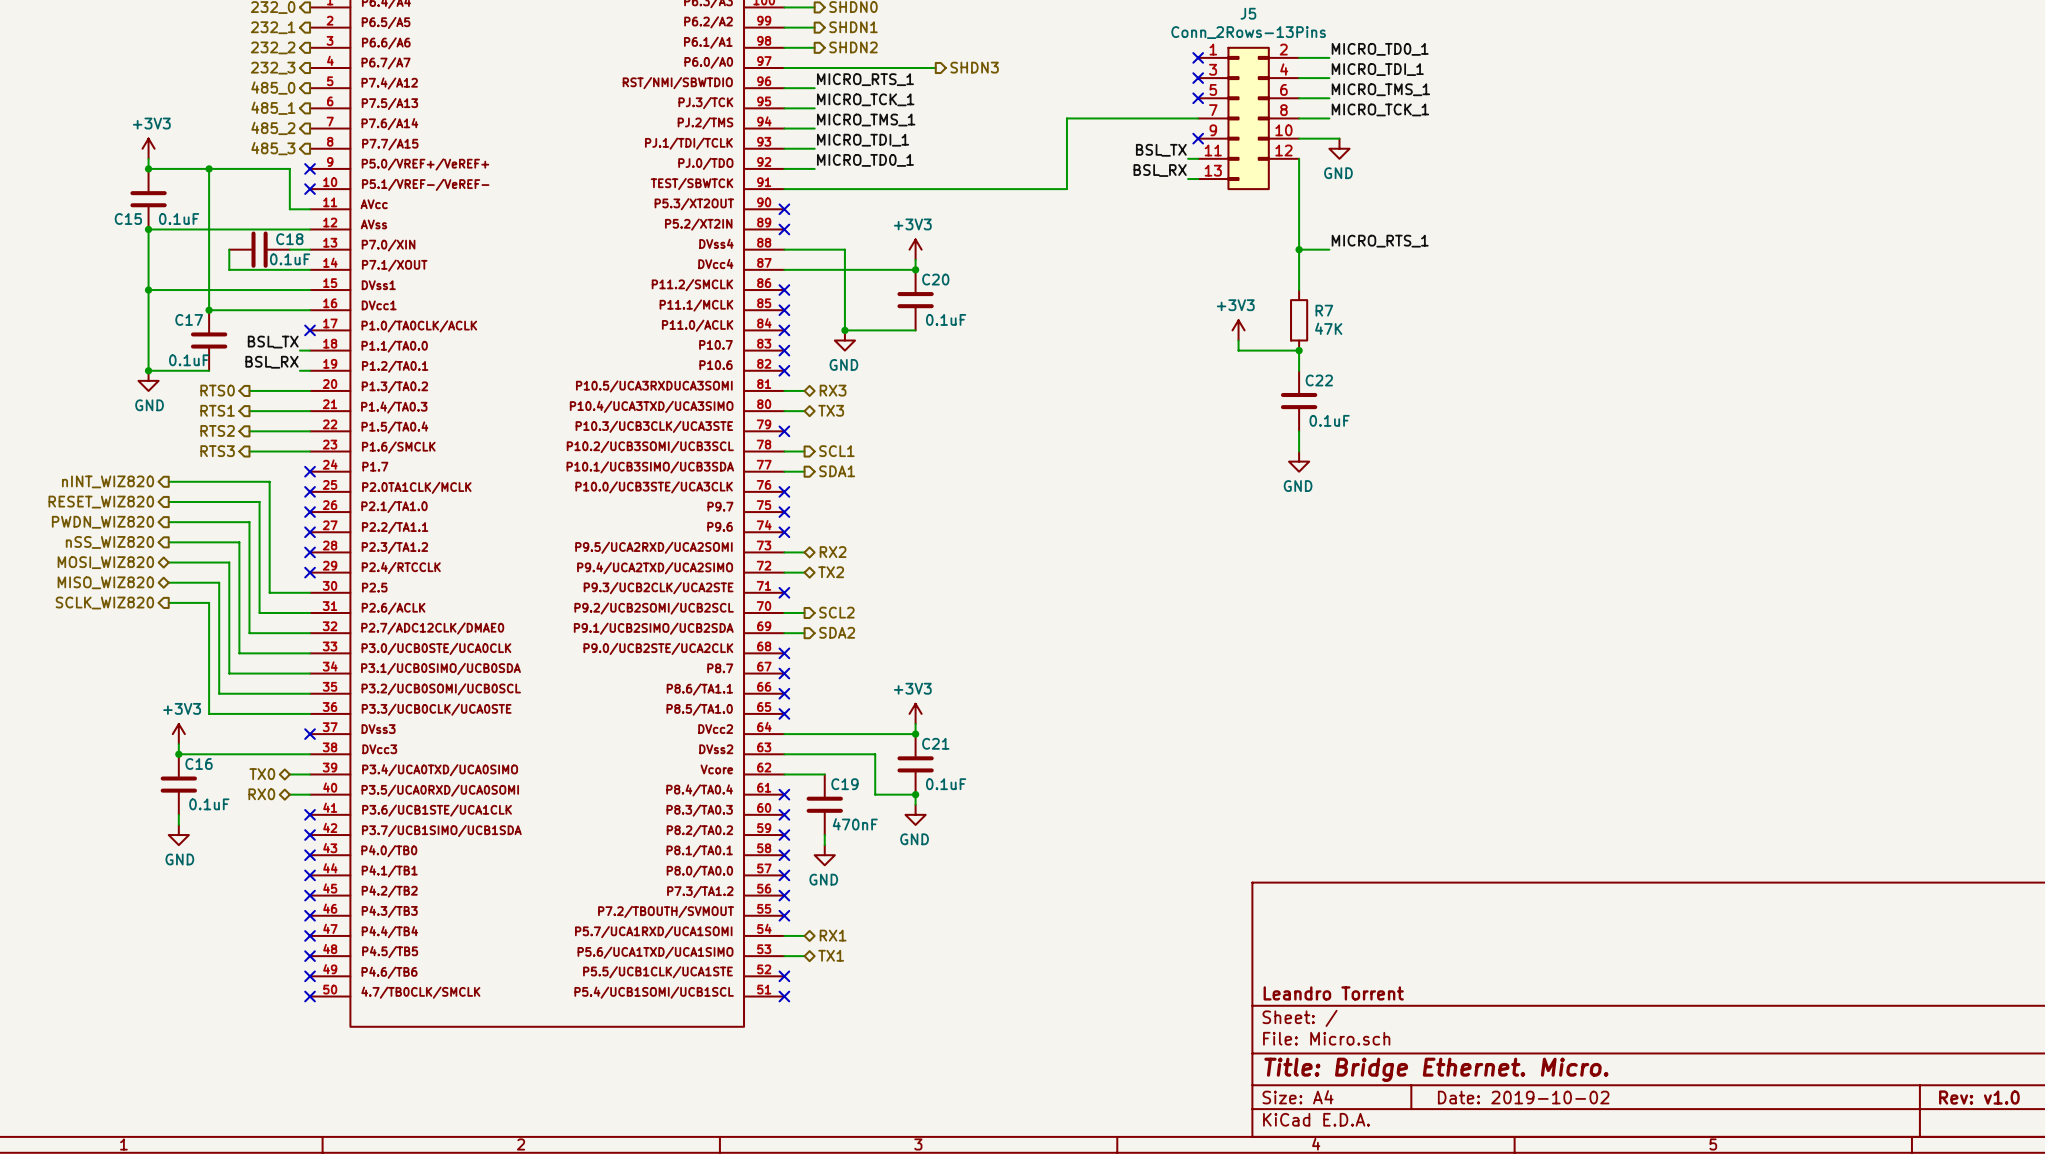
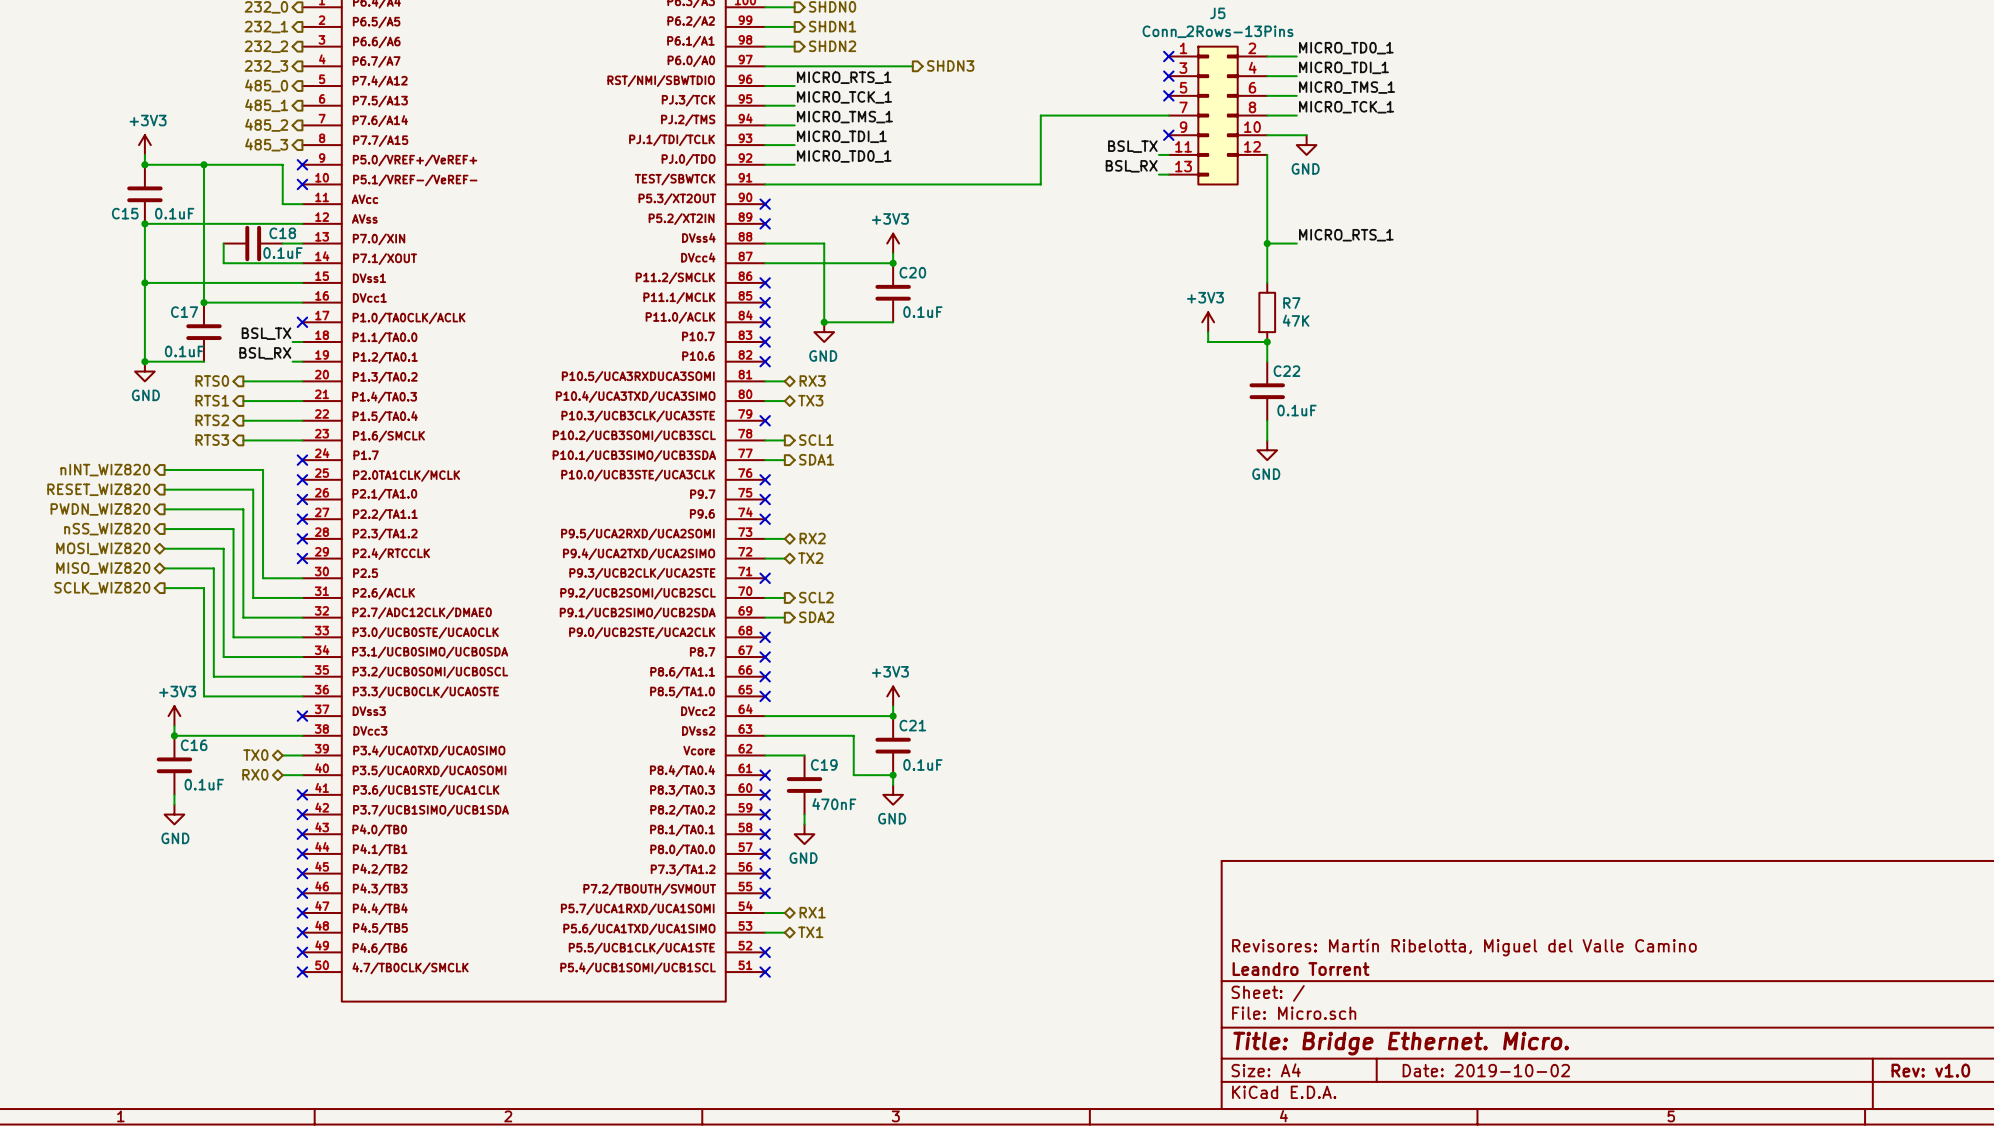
title block: none -> Revisores: Martín Ribelotta, Miguel del Valle Camino (1464, 947)

